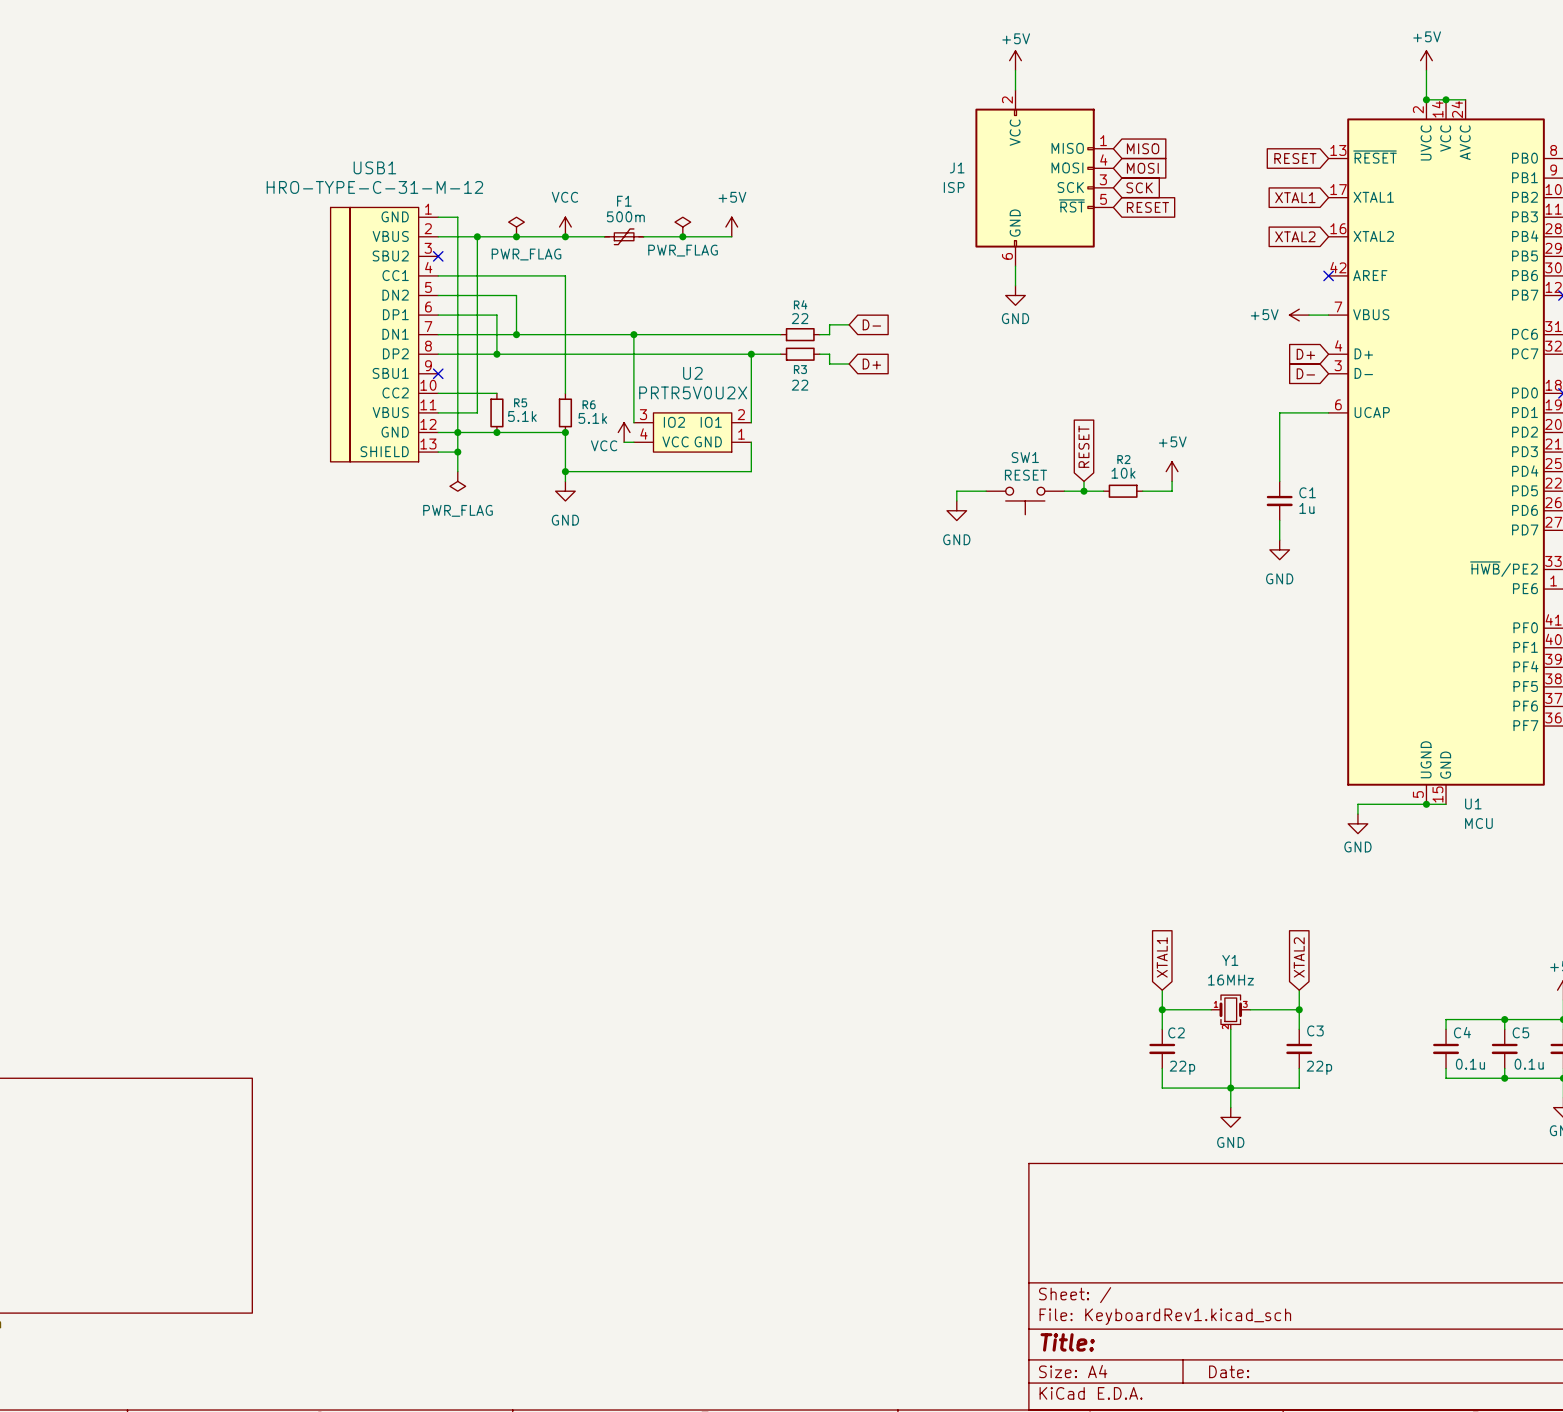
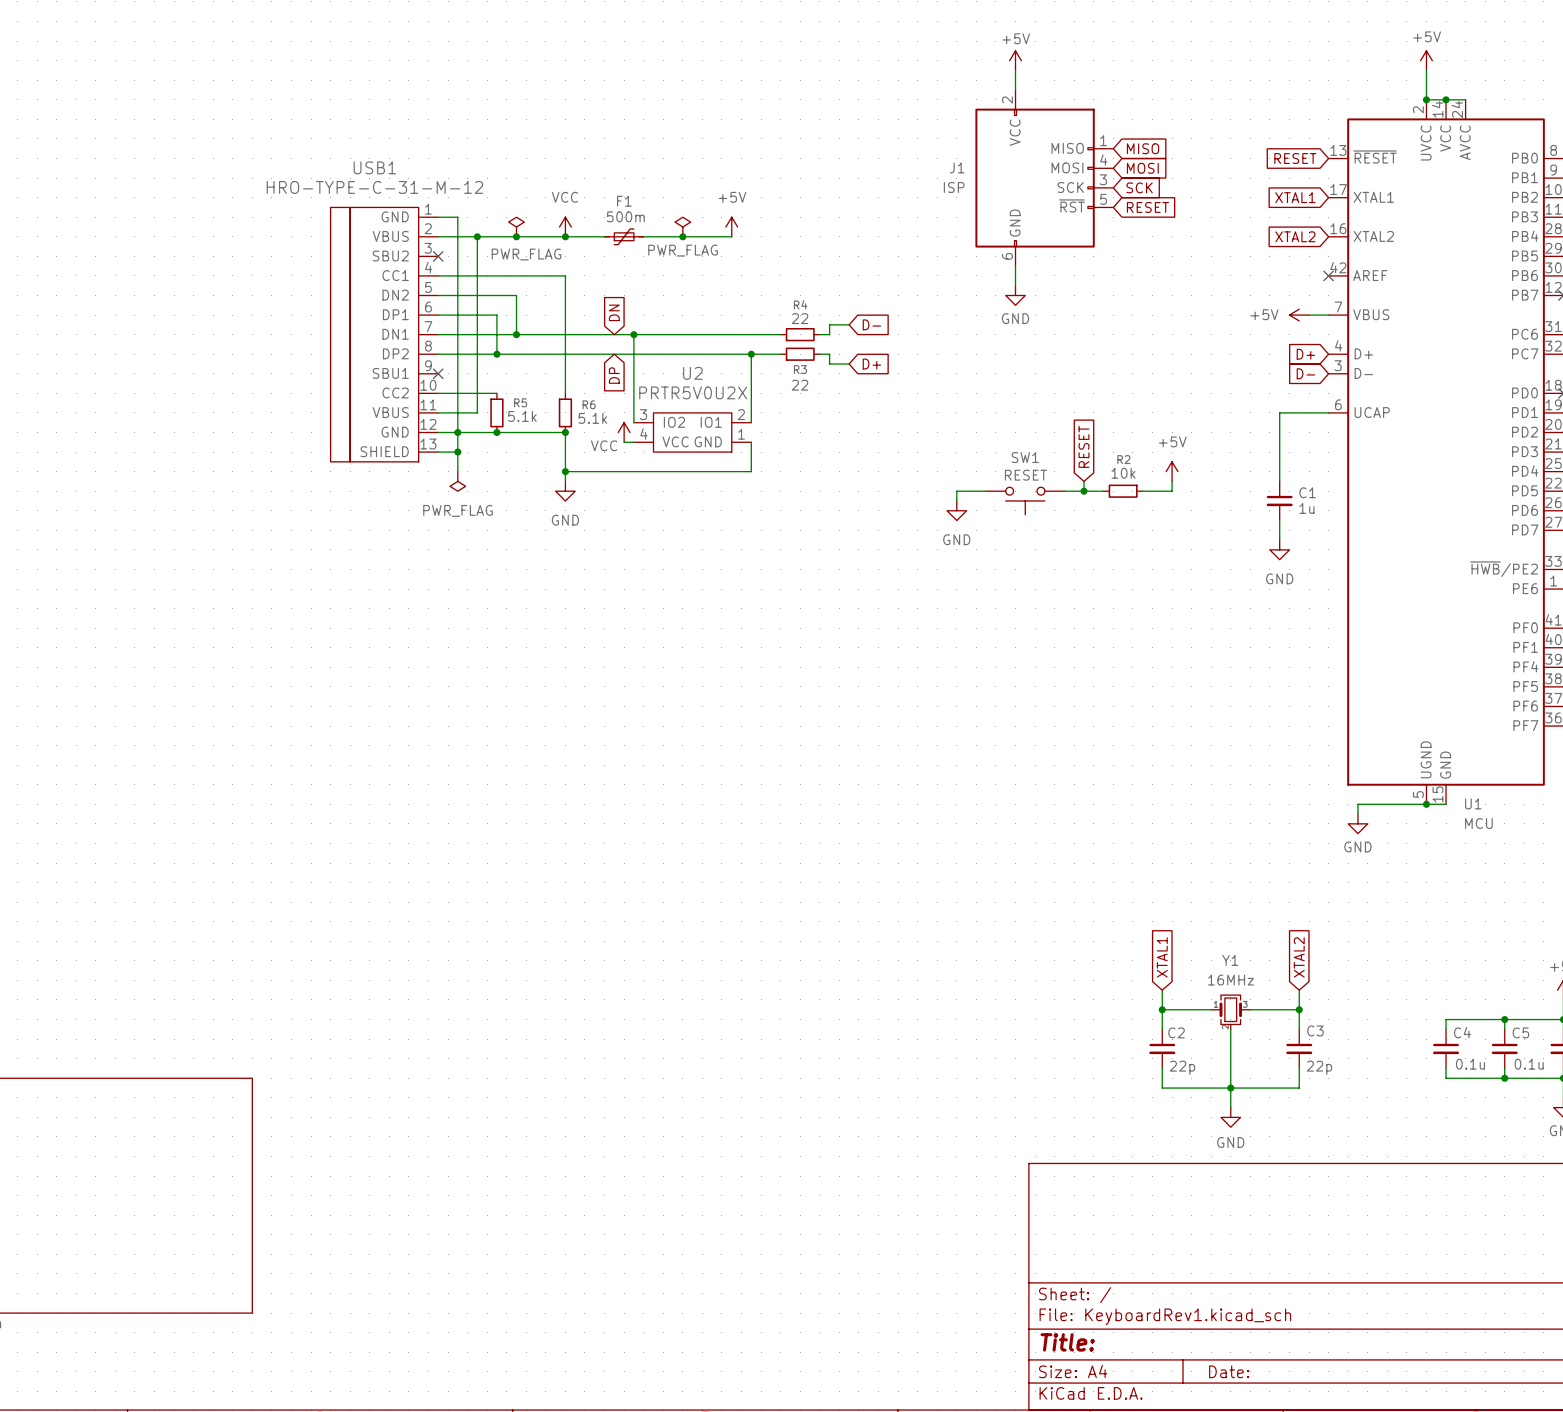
global label: none -> DN (614, 312)
global label: none -> DP (614, 375)

